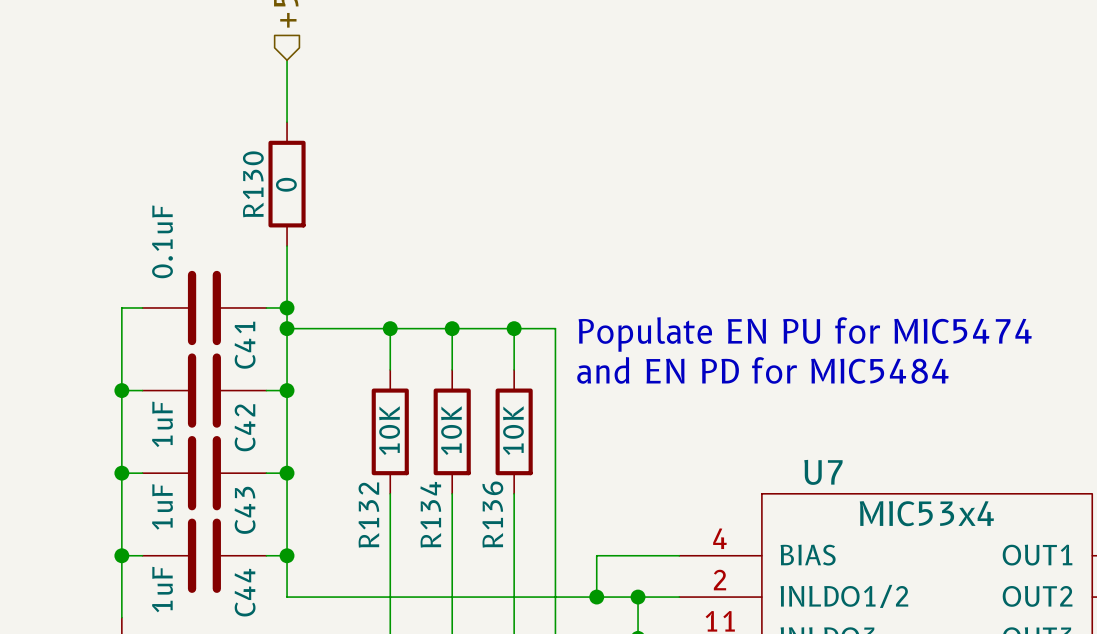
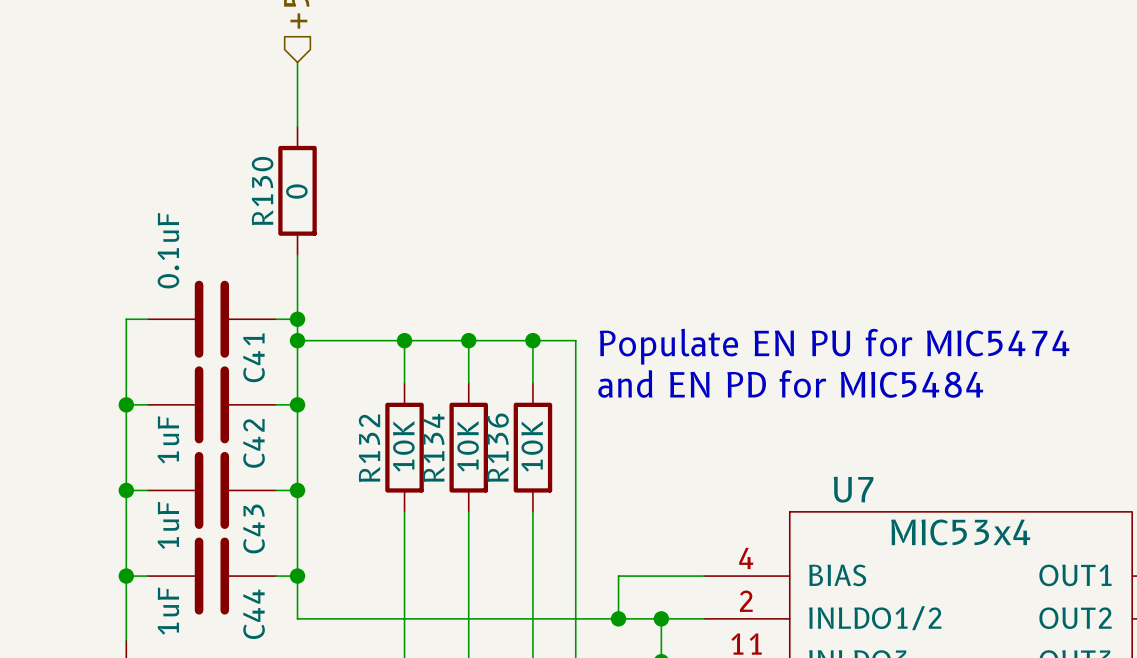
R134 name position: R134 (430, 514) -> R134 (433, 447)
R136 name position: R136 (492, 514) -> R136 (498, 447)
R132 name position: R132 (368, 515) -> R132 (369, 448)

